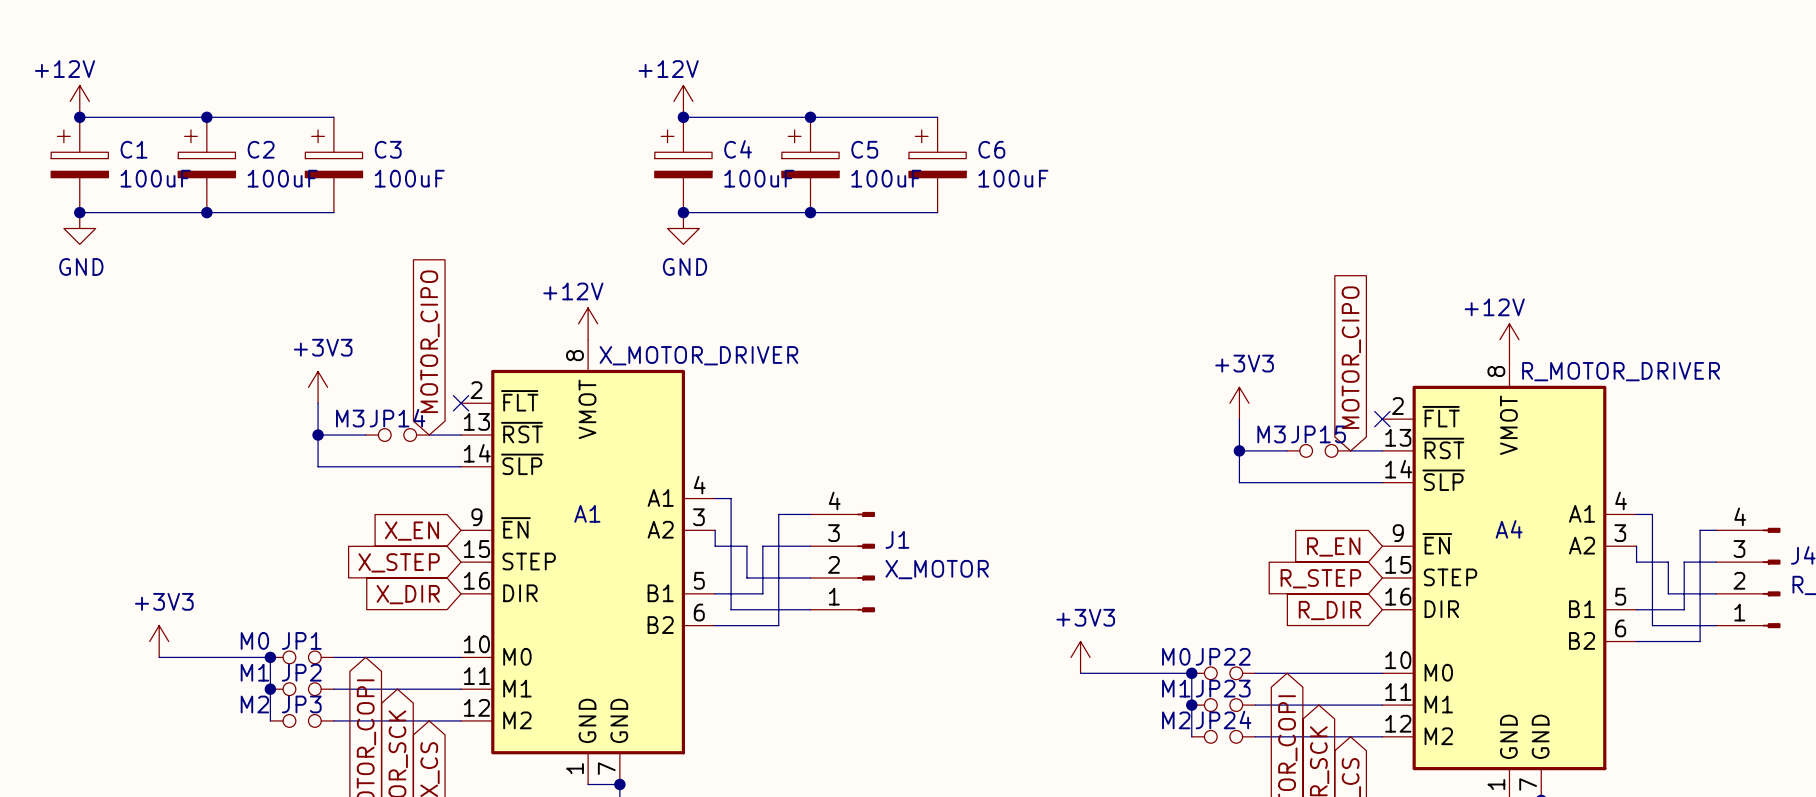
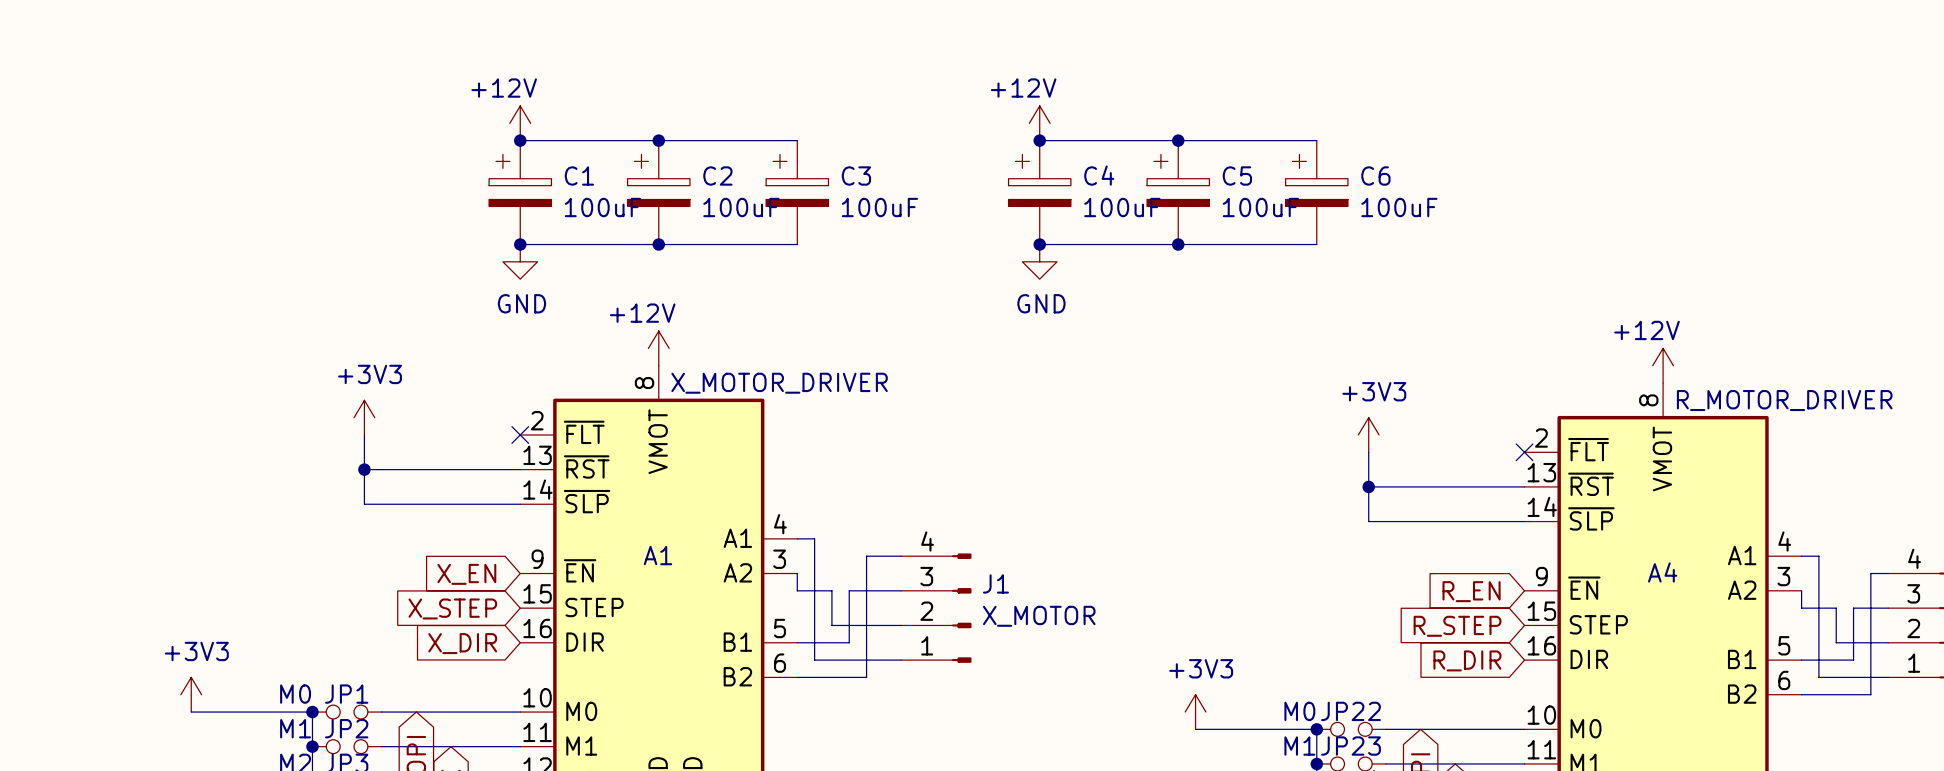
power symbol: +12V (79, 101) -> none
power symbol: +12V (683, 101) -> none
wire: (79, 117) (333, 117) -> none
junction: (79, 117) -> none
junction: (206, 117) -> none
power symbol: none -> +12V (520, 123)
wire: (683, 117) (937, 117) -> (520, 140) (797, 140)
junction: (683, 117) -> none
junction: (810, 117) -> none
power symbol: none -> +12V (1039, 123)
junction: none -> (520, 140)
junction: none -> (658, 140)
wire: none -> (1039, 140) (1316, 140)
junction: none -> (1039, 140)
junction: none -> (1178, 140)
C1 position: (79, 164) -> (520, 192)
C2 position: (206, 164) -> (658, 192)
C3 position: (333, 164) -> (797, 192)
C4 position: (683, 164) -> (1039, 192)
C5 position: (810, 164) -> (1178, 192)
C6 position: (937, 164) -> (1316, 192)
wire: (79, 212) (333, 212) -> none
junction: (79, 212) -> none
junction: (206, 212) -> none
wire: (683, 212) (937, 212) -> (520, 244) (797, 244)
junction: (683, 212) -> none
junction: (810, 212) -> none
power symbol: GND (79, 228) -> none
junction: none -> (520, 244)
junction: none -> (658, 244)
power symbol: GND (683, 228) -> none
wire: none -> (1039, 244) (1316, 244)
junction: none -> (1039, 244)
junction: none -> (1178, 244)
power symbol: none -> GND (520, 261)
power symbol: none -> GND (1039, 261)
global label: MOTOR_CIPO (430, 341) -> none
global label: MOTOR_CIPO (1351, 357) -> none
wire: none -> (416, 469) (485, 469)
JP14: M3 (397, 435) -> none
wire: none -> (1420, 486) (1489, 486)
JP15: M3 (1318, 450) -> none

